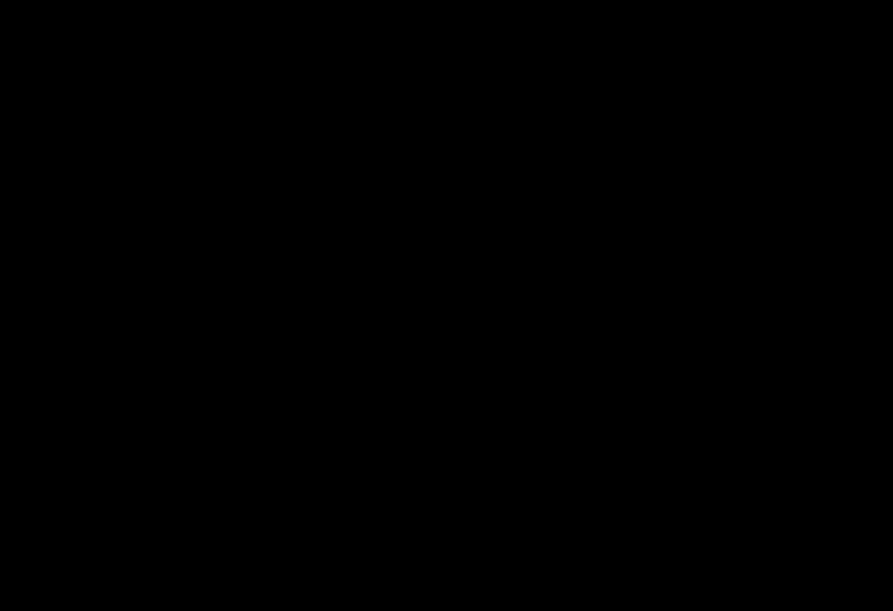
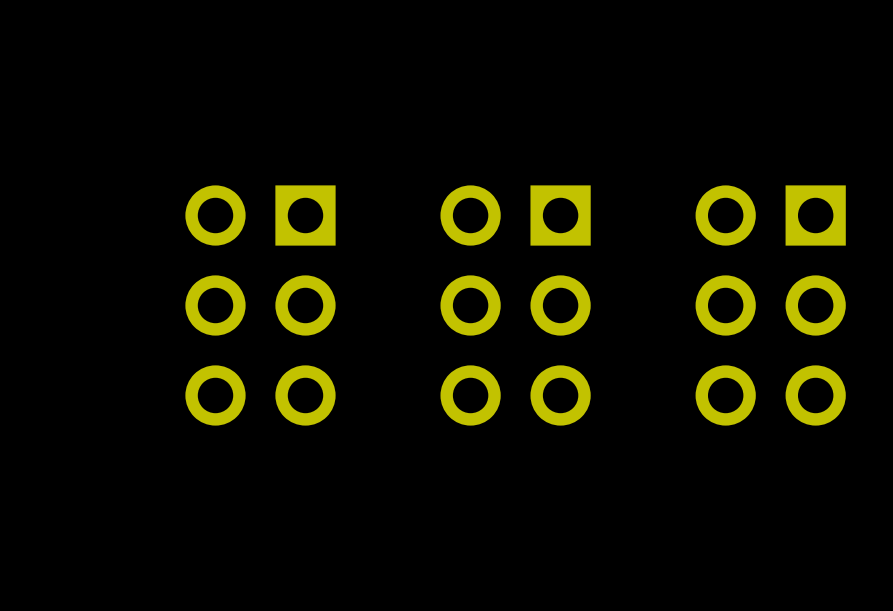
part: none -> (260, 305)
part: none -> (515, 305)
part: none -> (770, 305)

